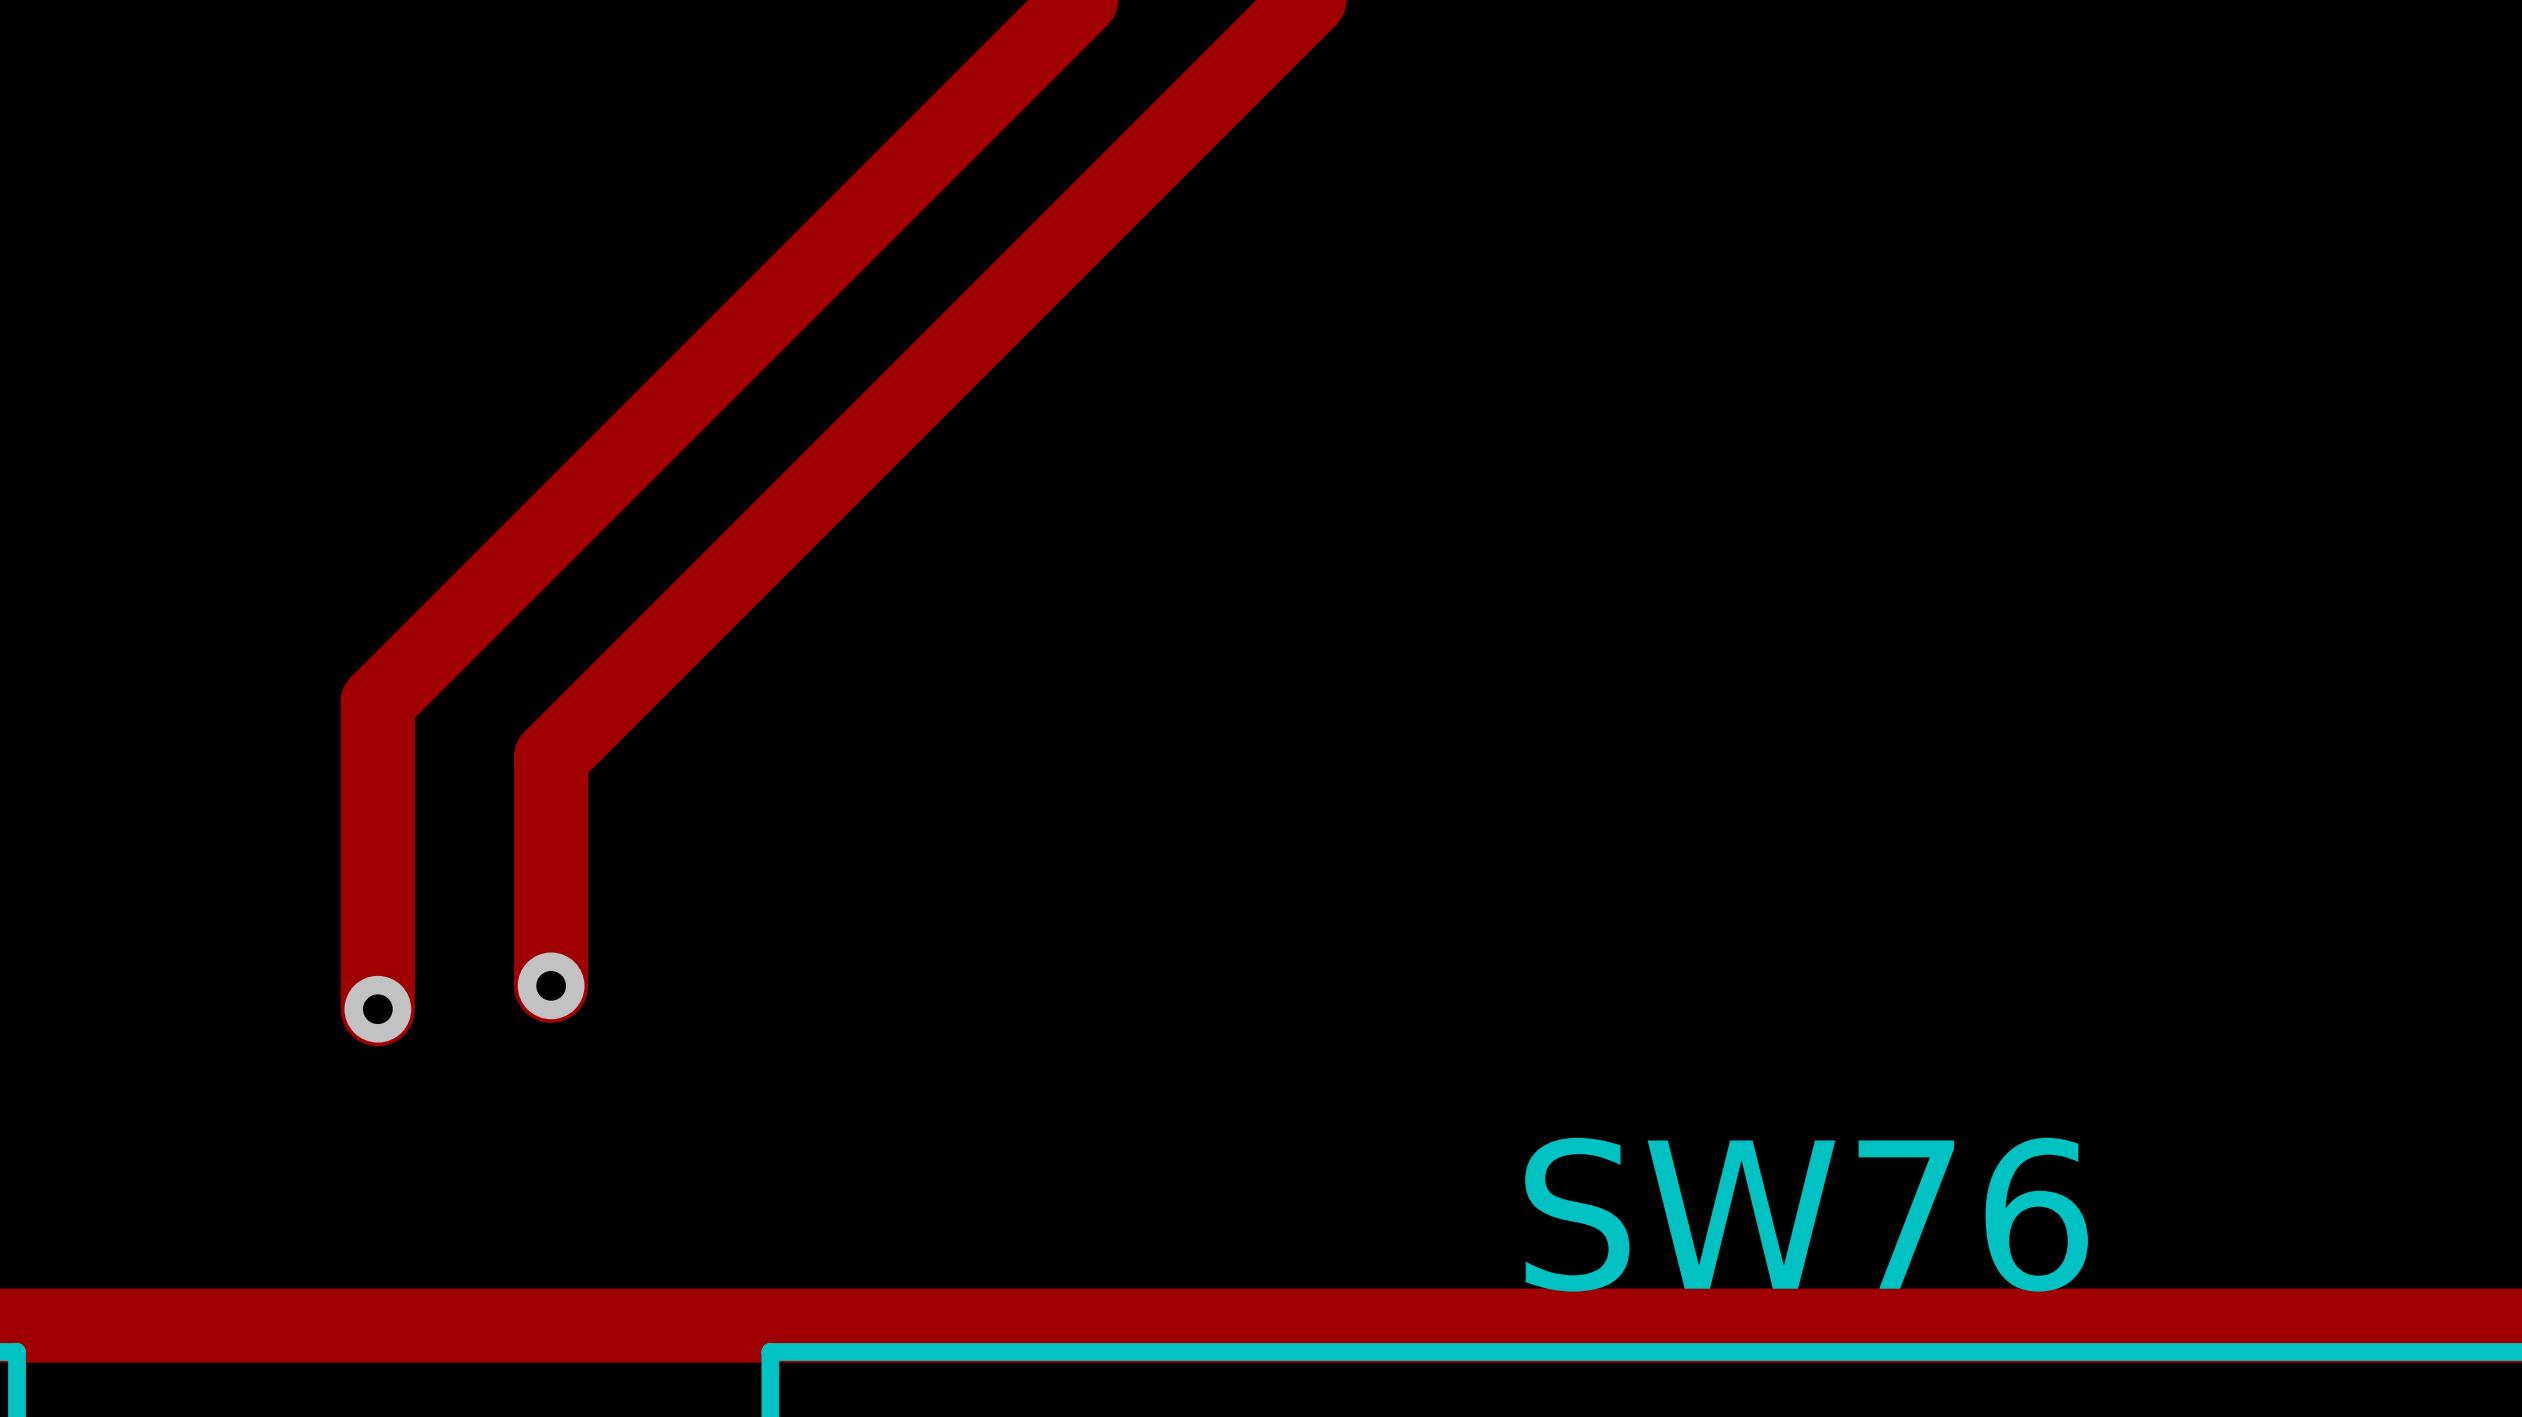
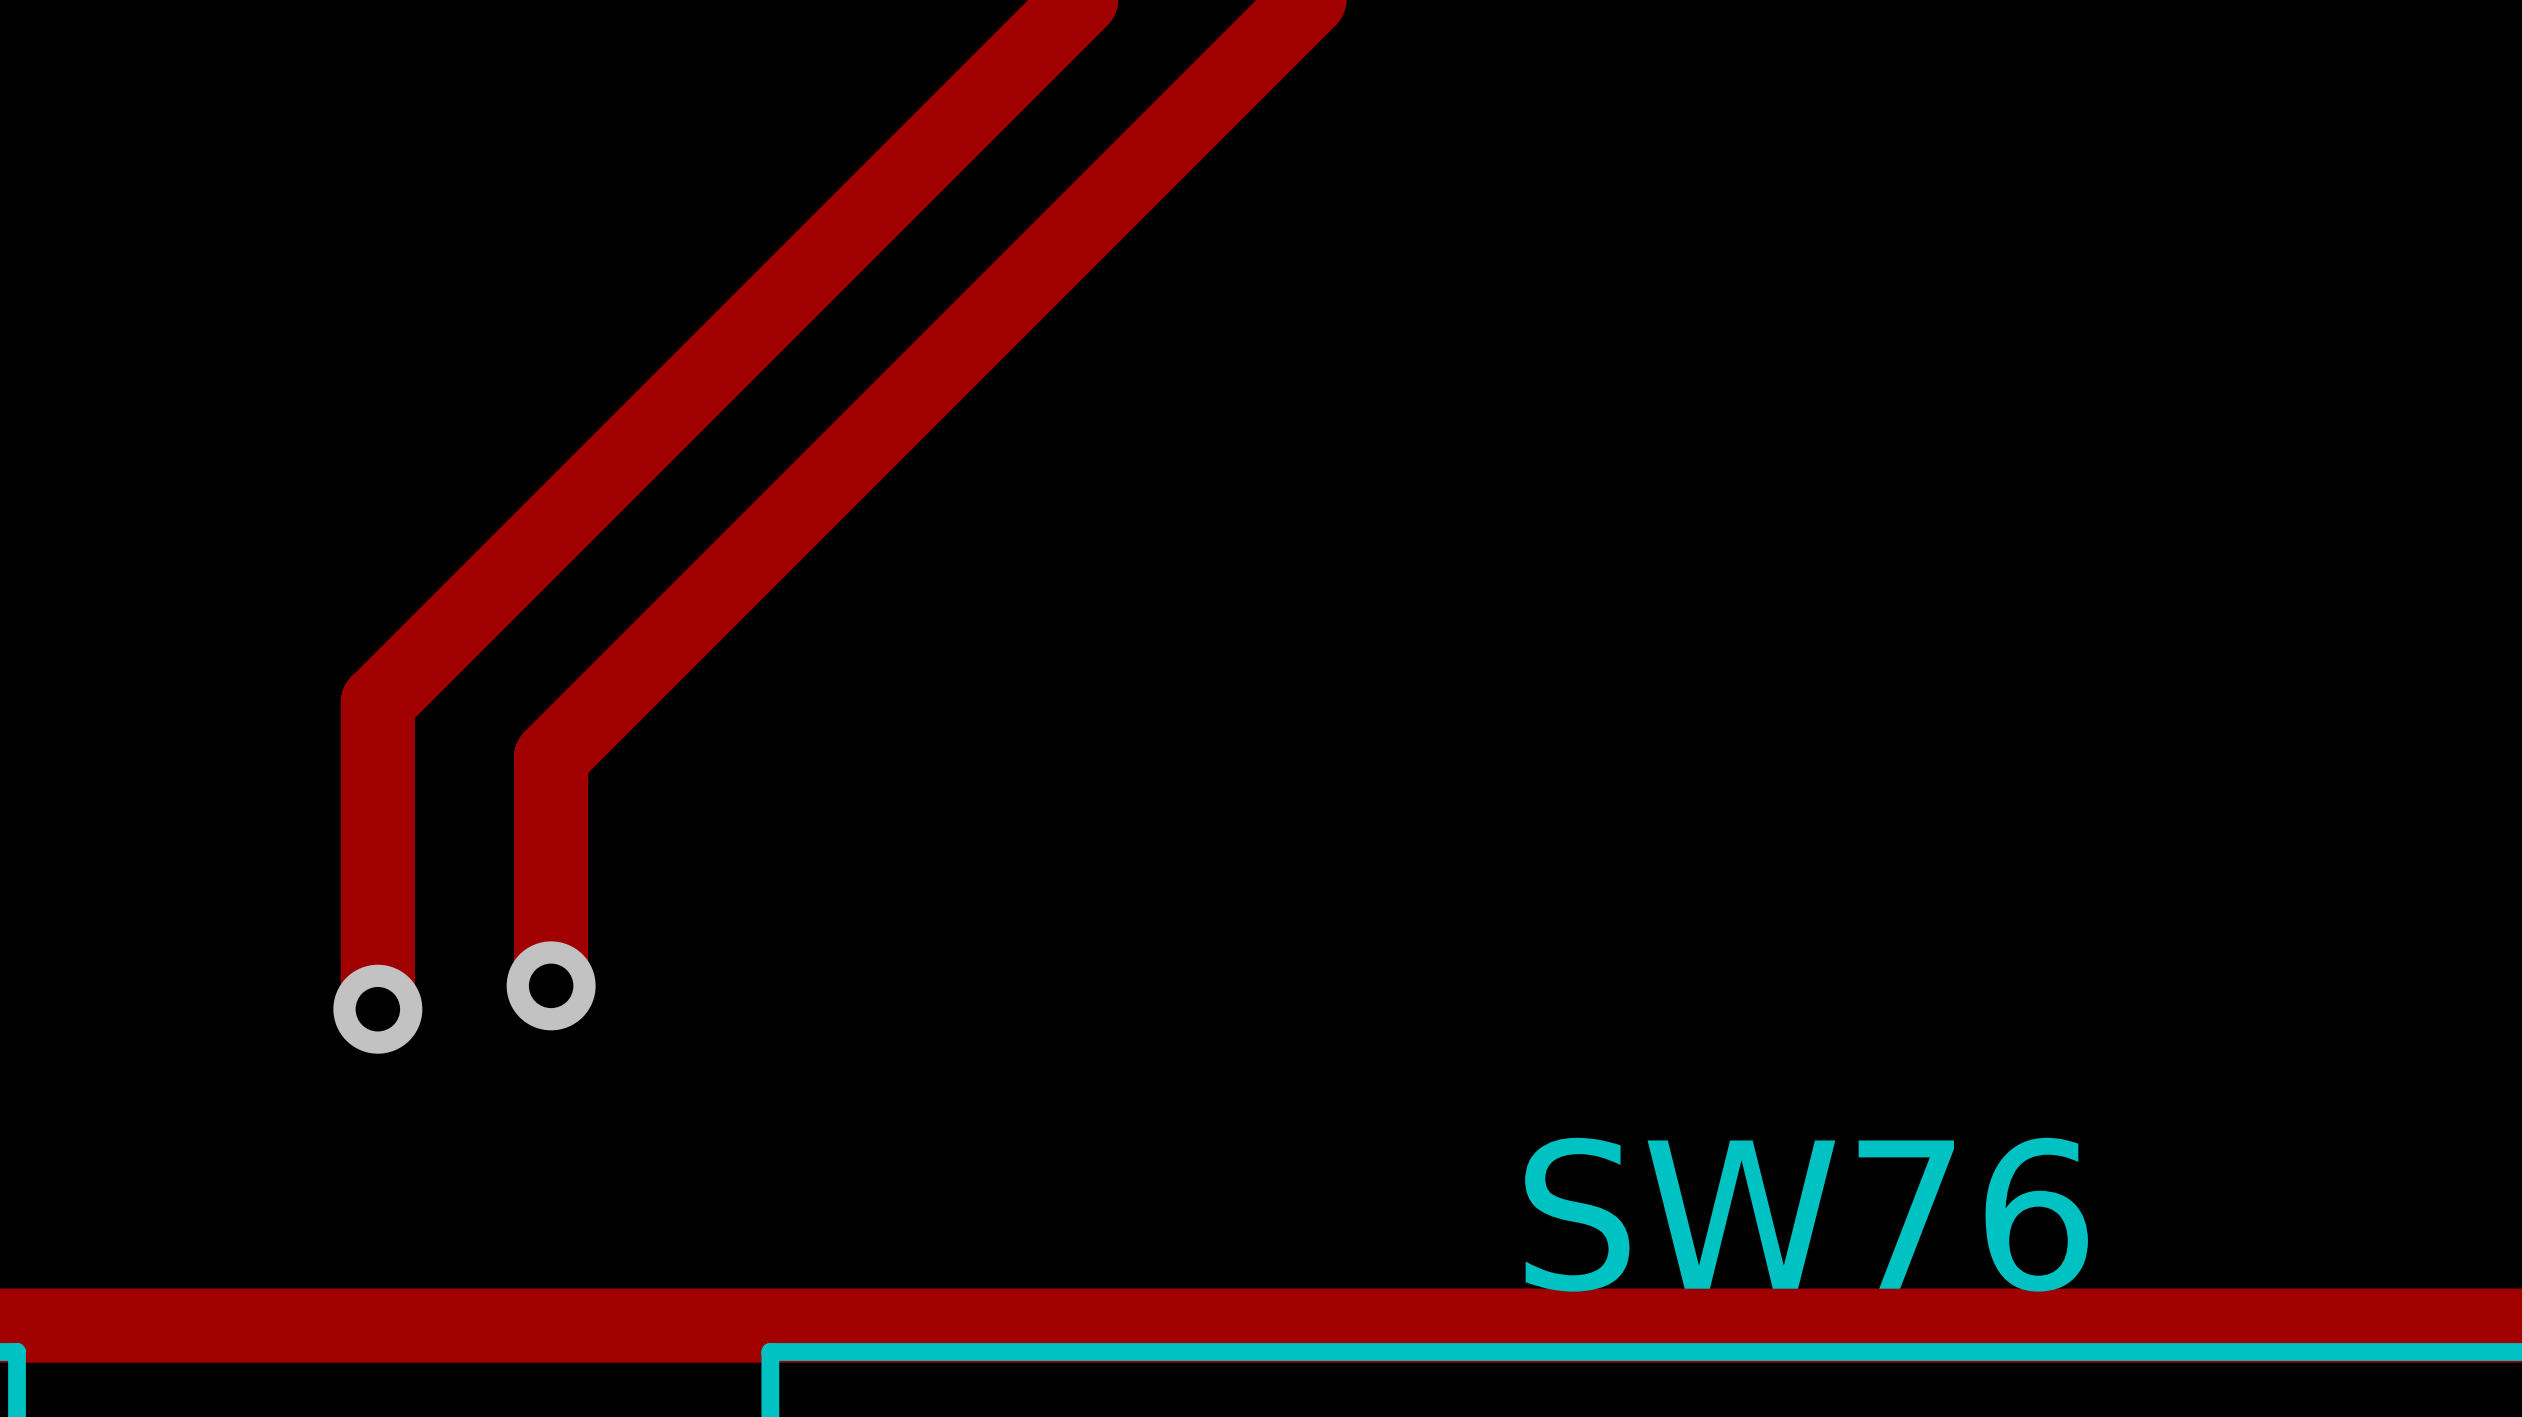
via size: [517, 952, 585, 1020] -> [506, 941, 596, 1031]
via size: [344, 975, 412, 1043] -> [333, 964, 423, 1054]

